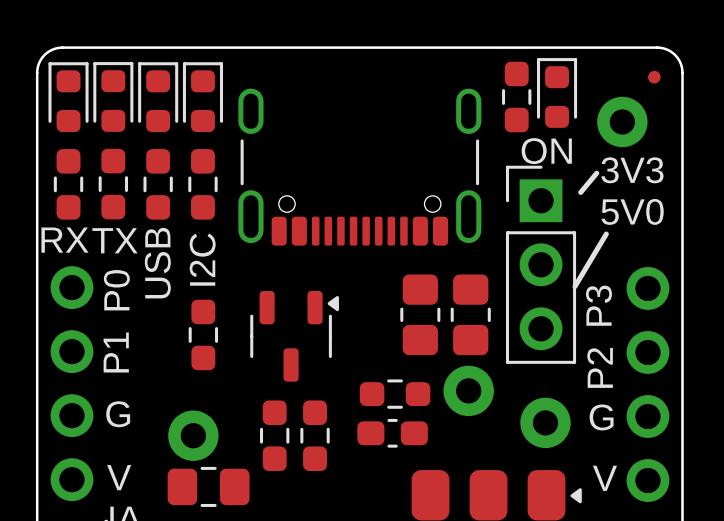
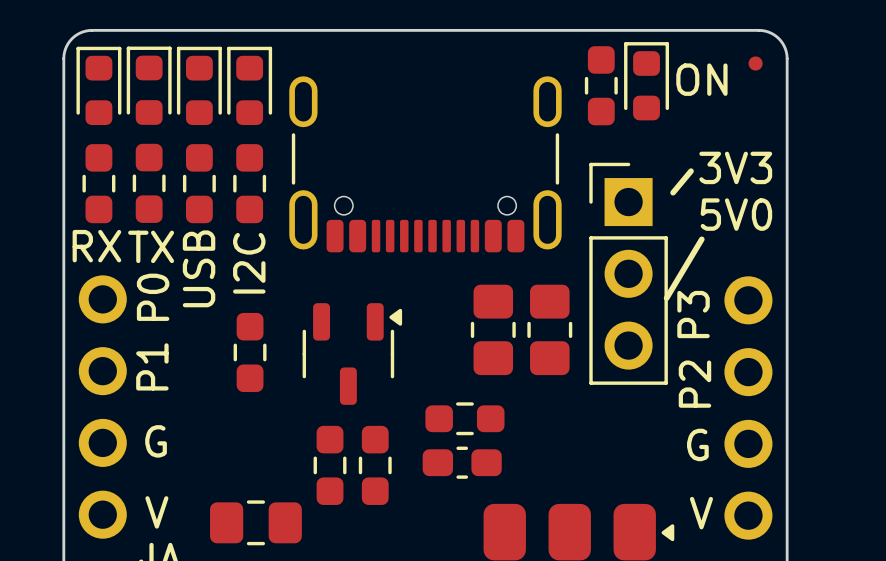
part: (622, 121) -> none
text position: ON (546, 151) -> ON (701, 79)
part: (468, 390) -> none
part: (545, 422) -> none
part: (193, 435) -> none

